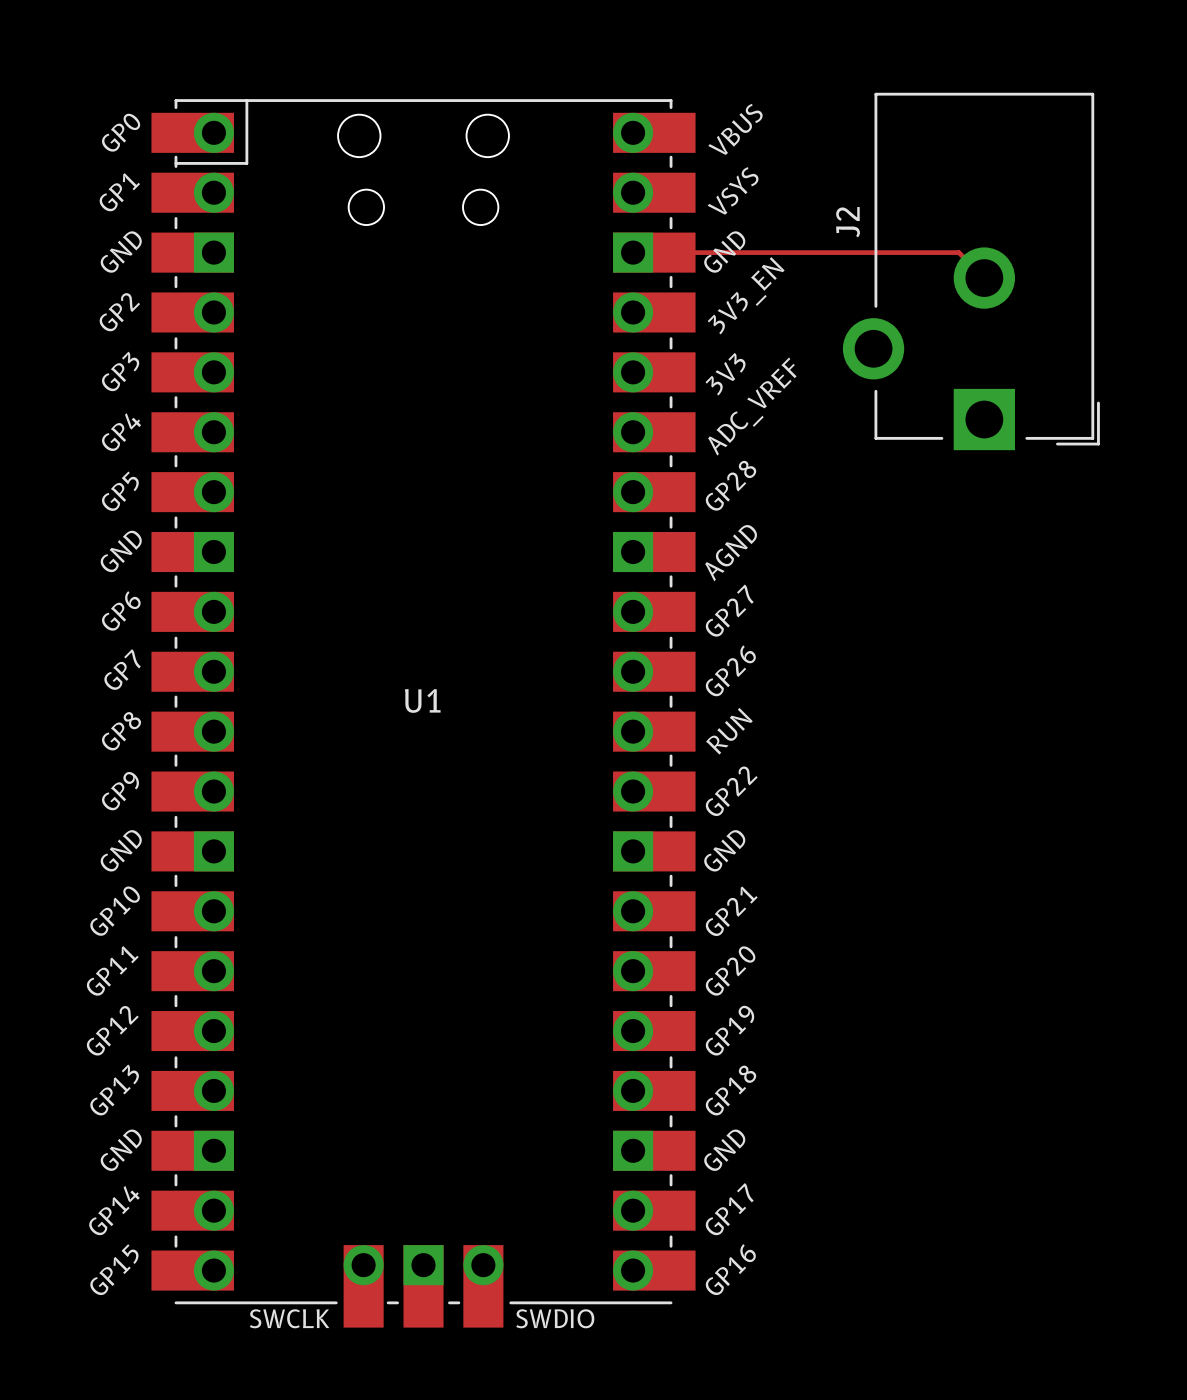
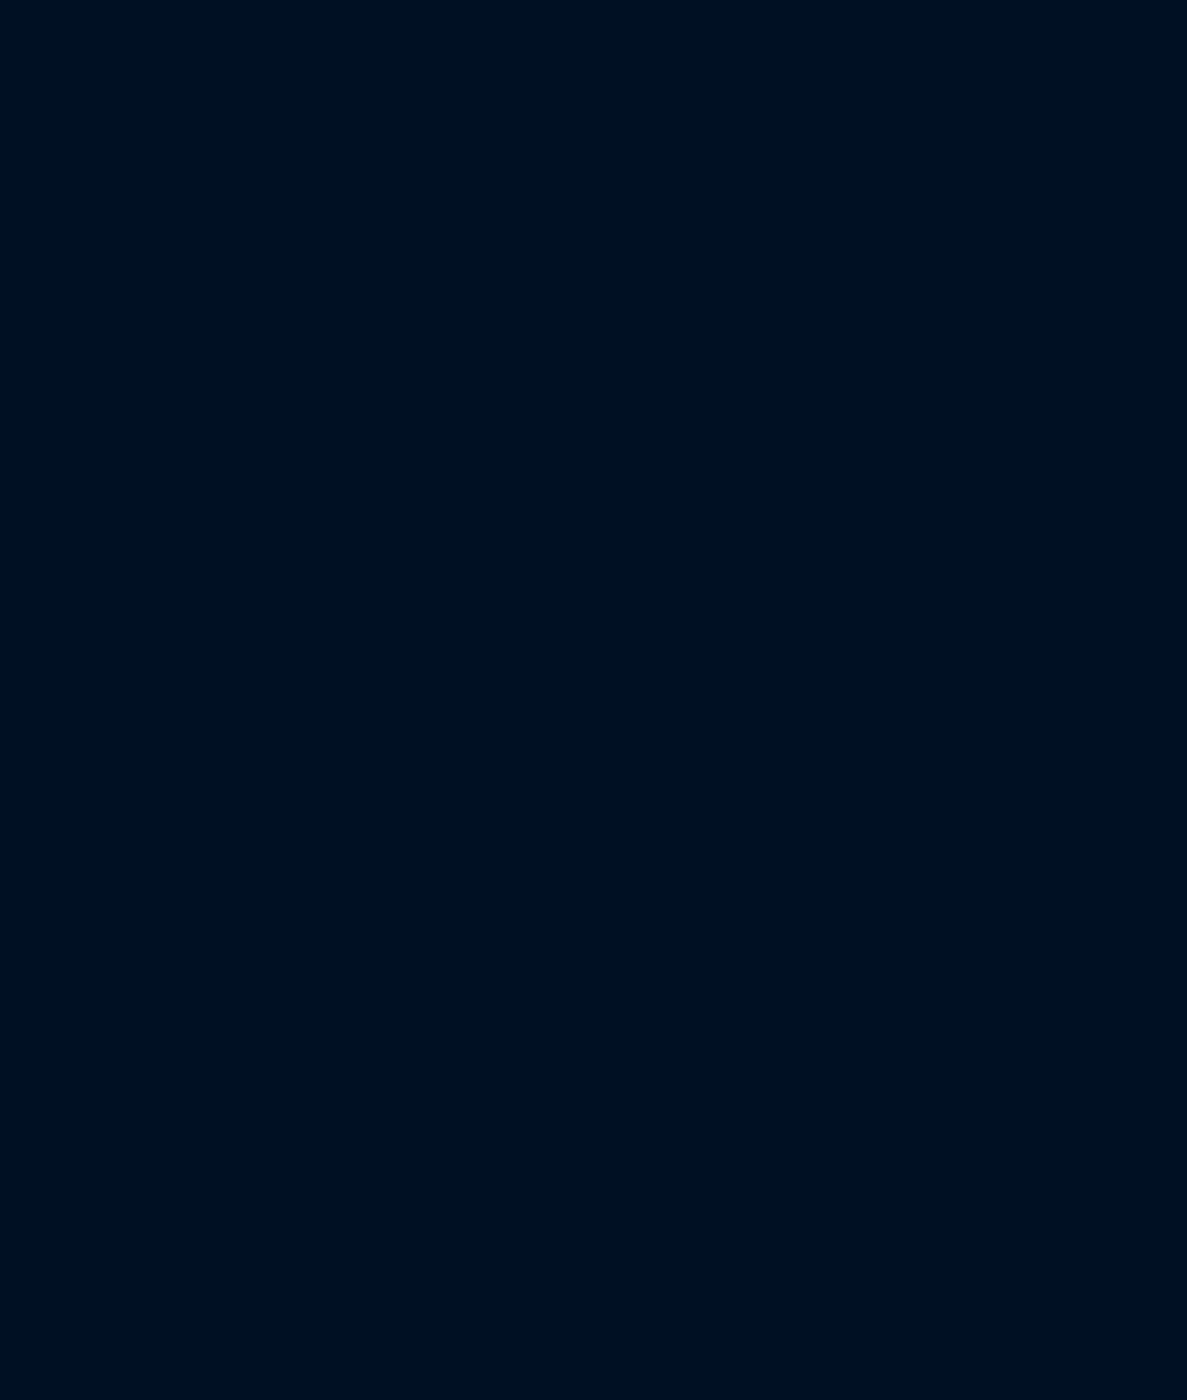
top track: (633, 252) (958, 252) (984, 278) -> none
J2: (971, 271) -> none
U1: (423, 713) -> none

